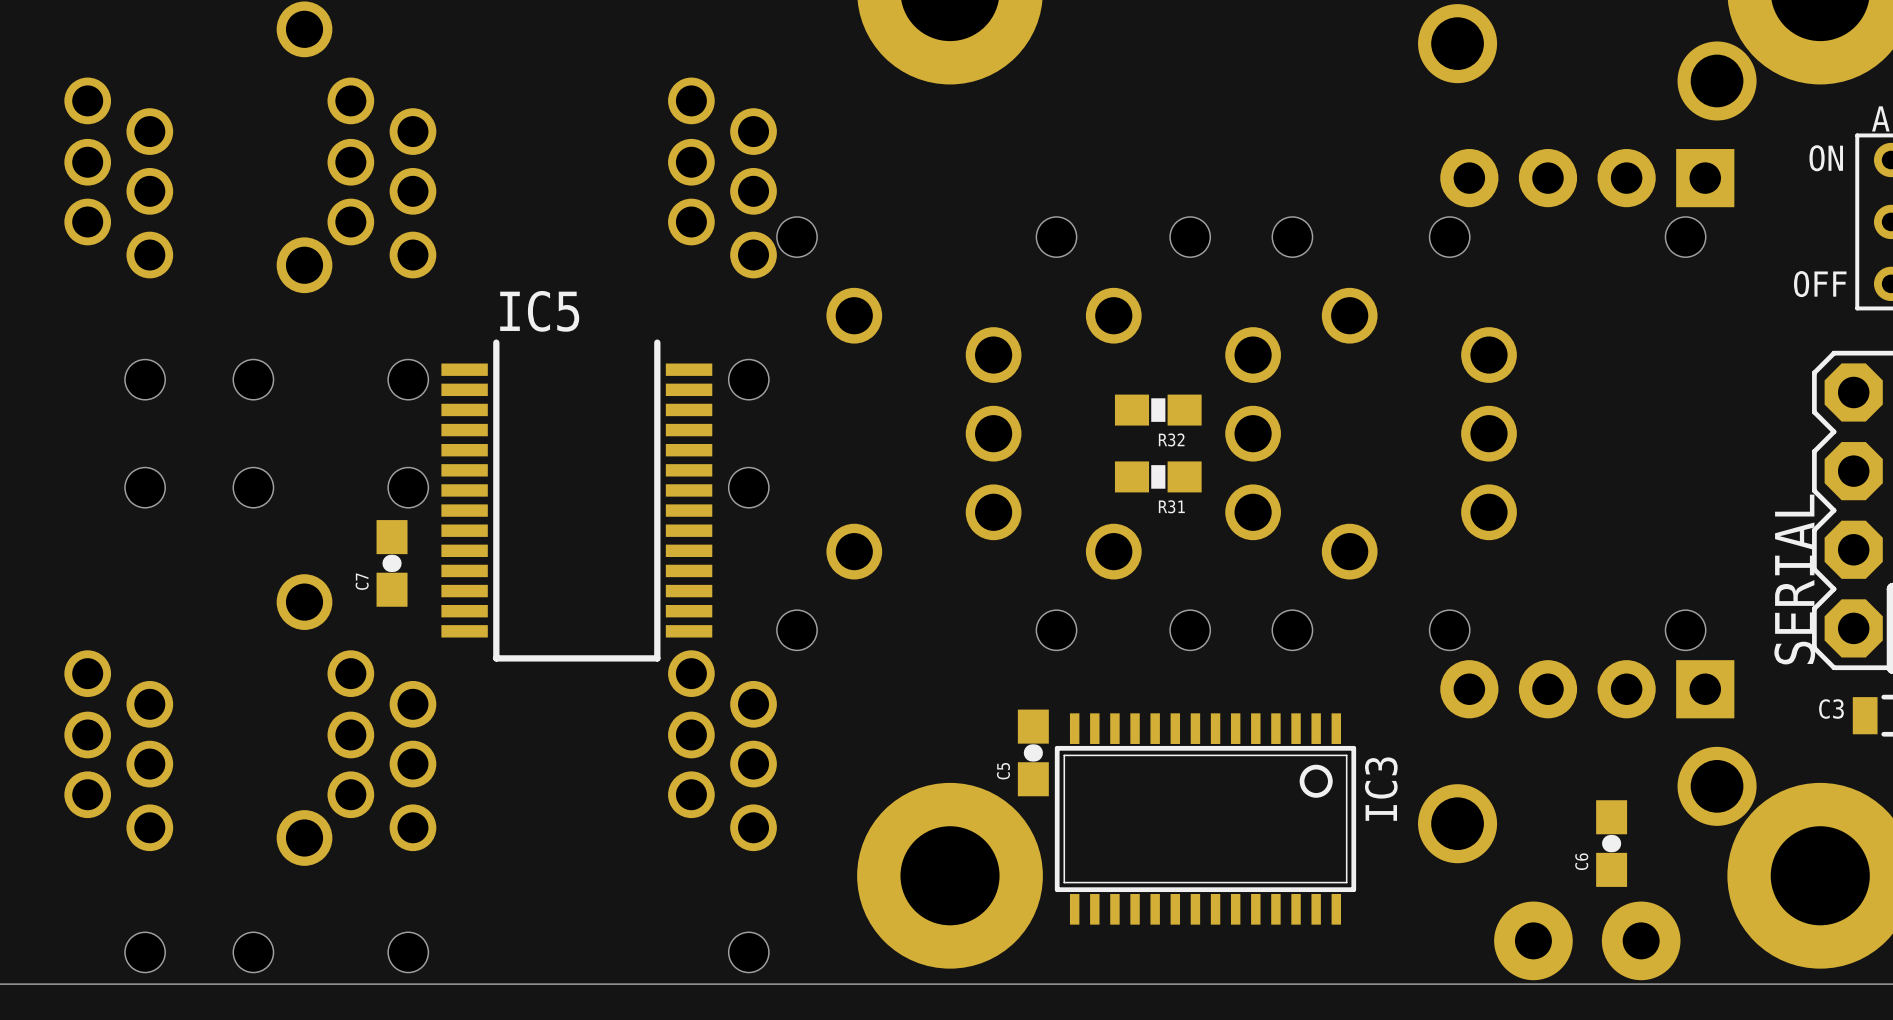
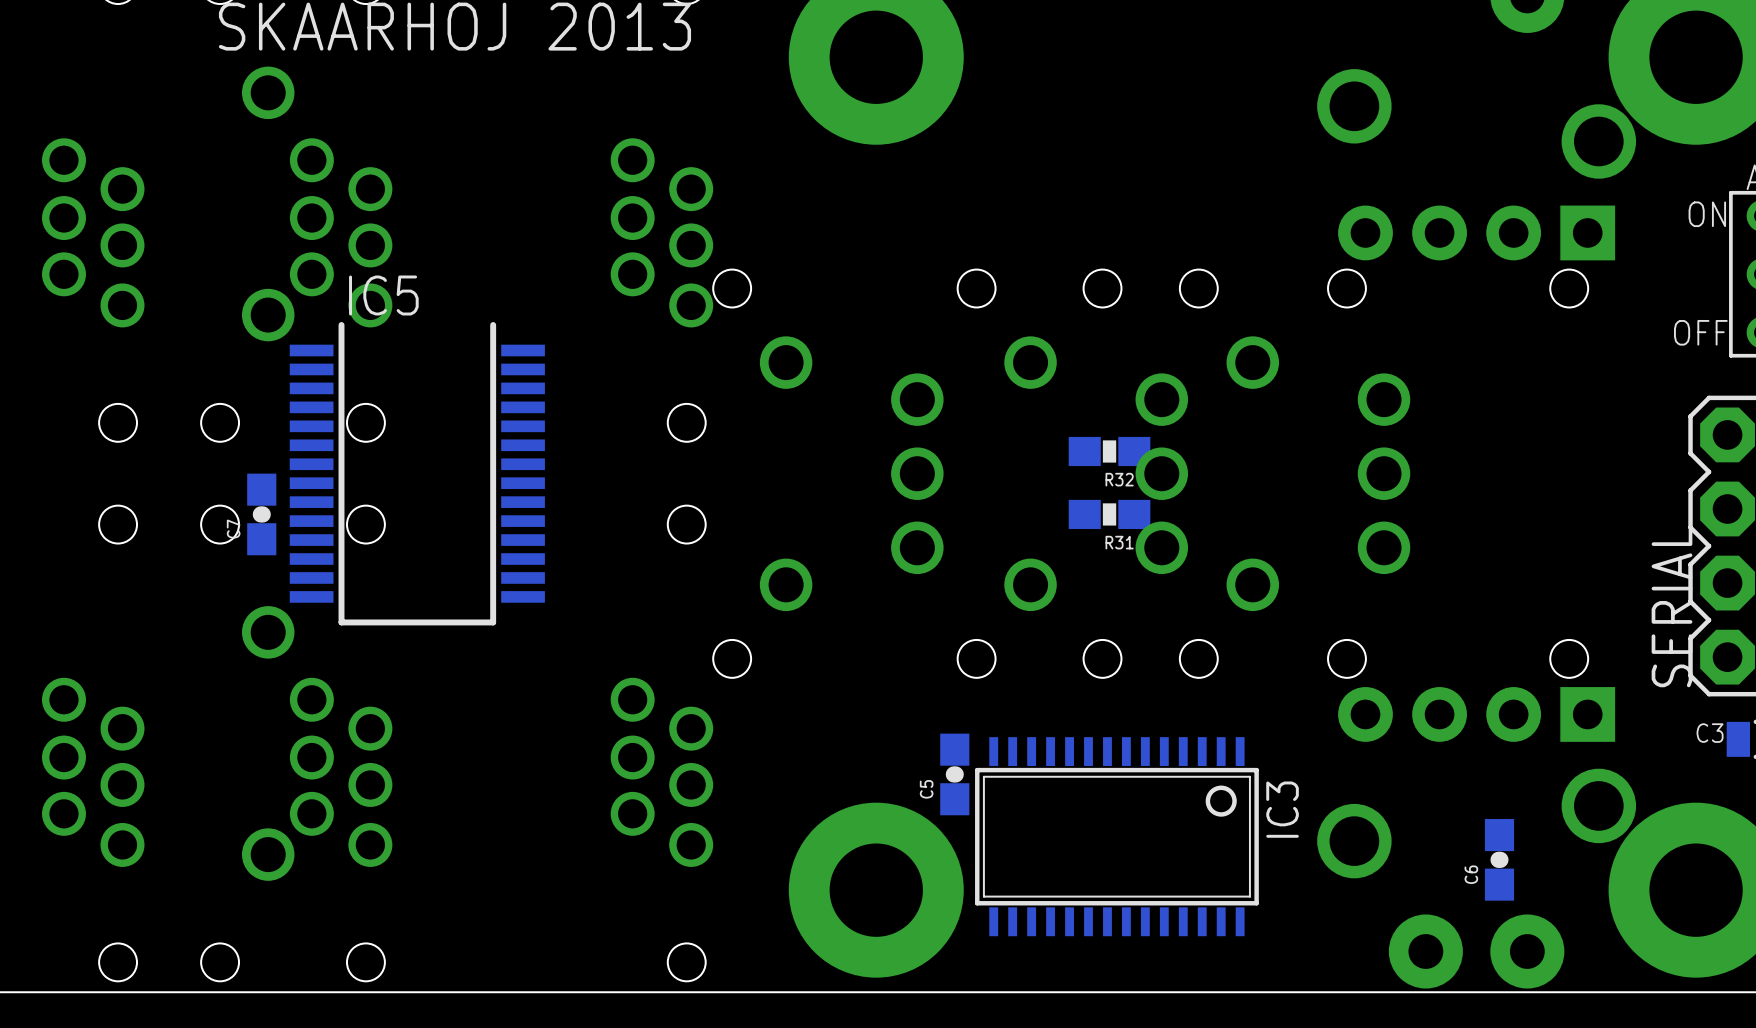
R32 position: (1158, 410) -> (1109, 451)
R31 position: (1158, 476) -> (1109, 514)
IC5 position: (576, 500) -> (417, 473)
C7 position: (392, 563) -> (261, 514)

